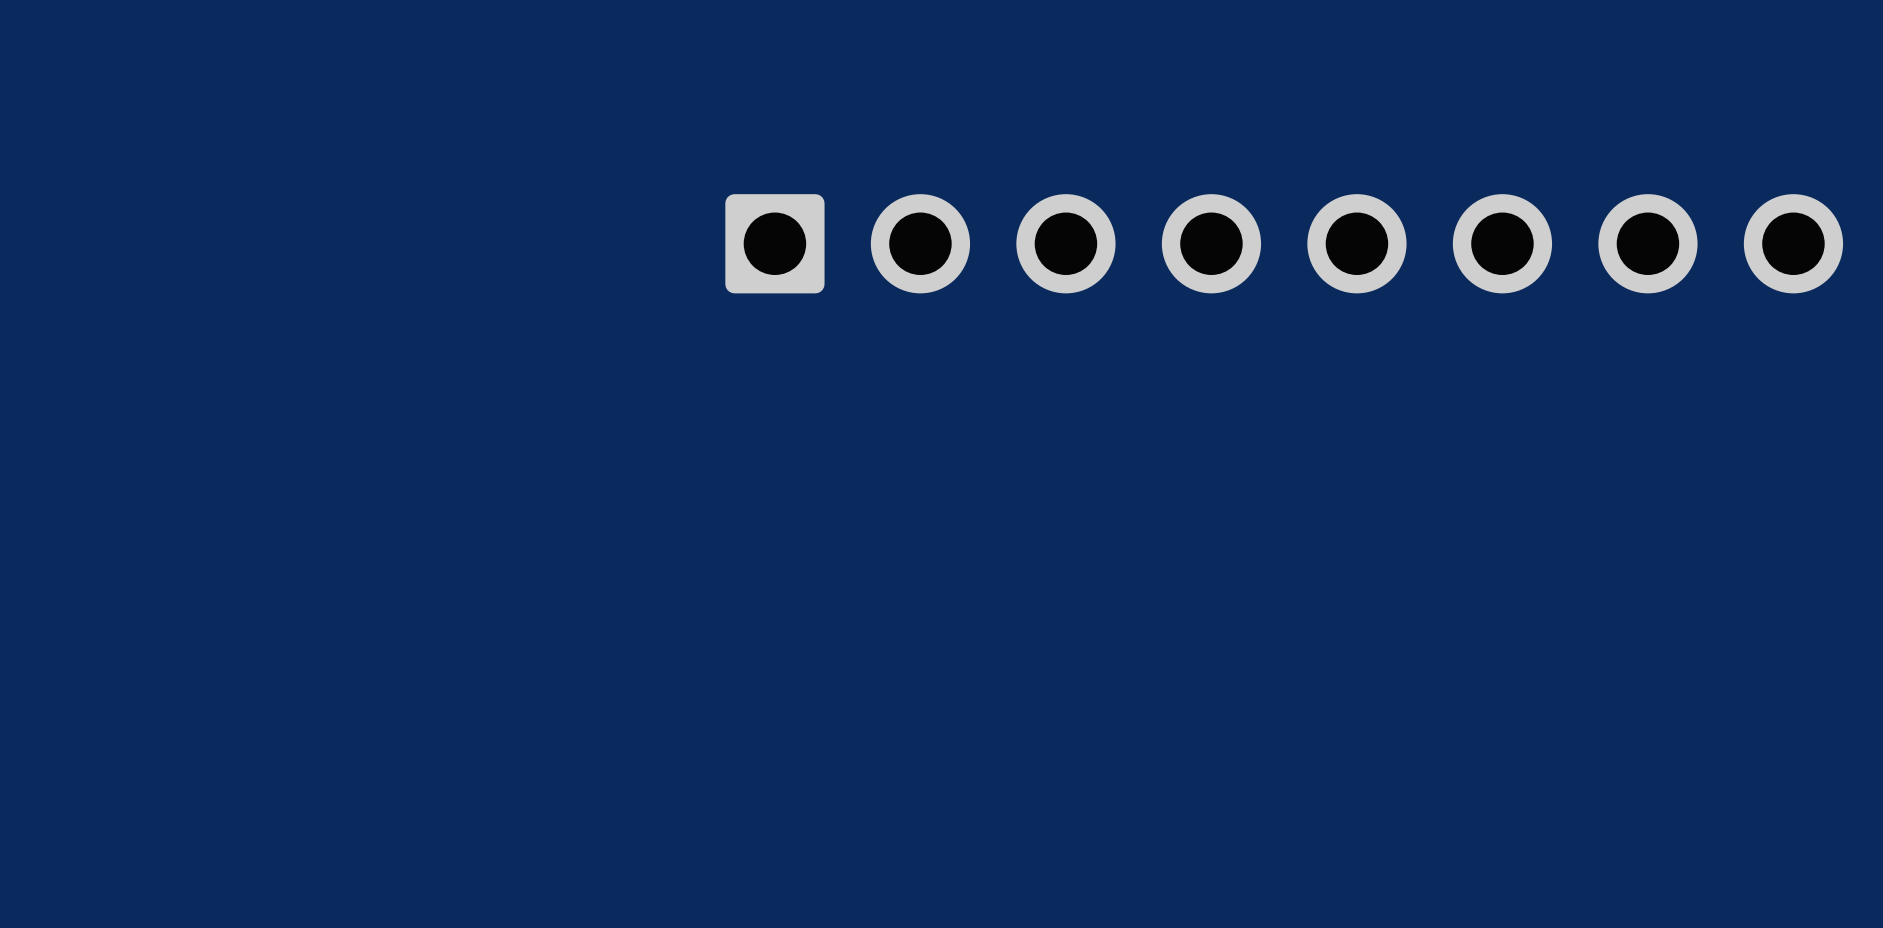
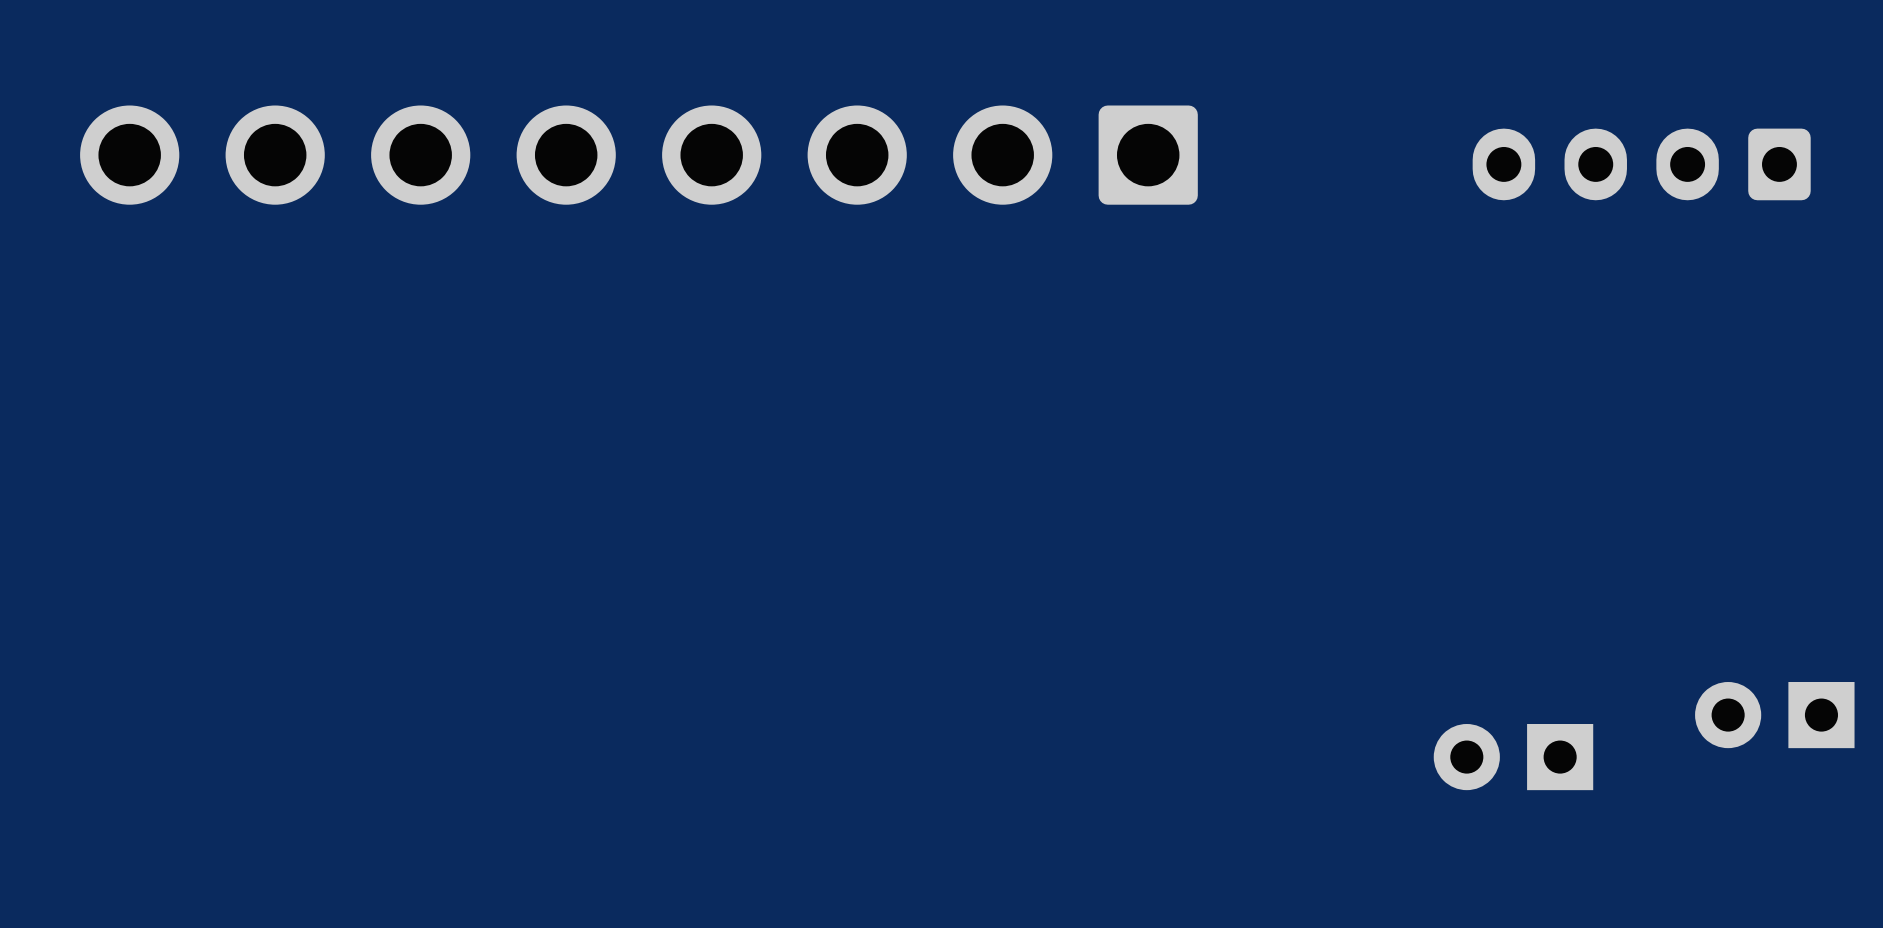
part: none -> (1641, 164)
part rotation: 0° (1284, 243) -> 180° (638, 155)
part: none -> (1774, 715)
part: none -> (1513, 757)

